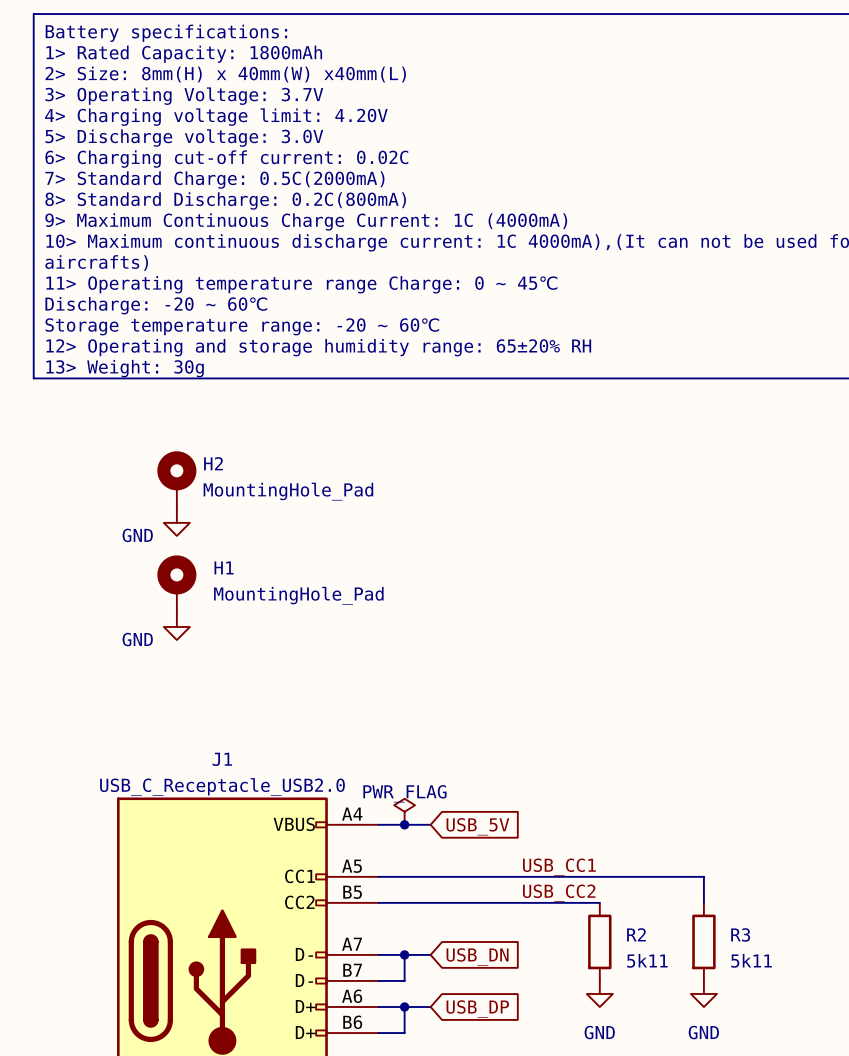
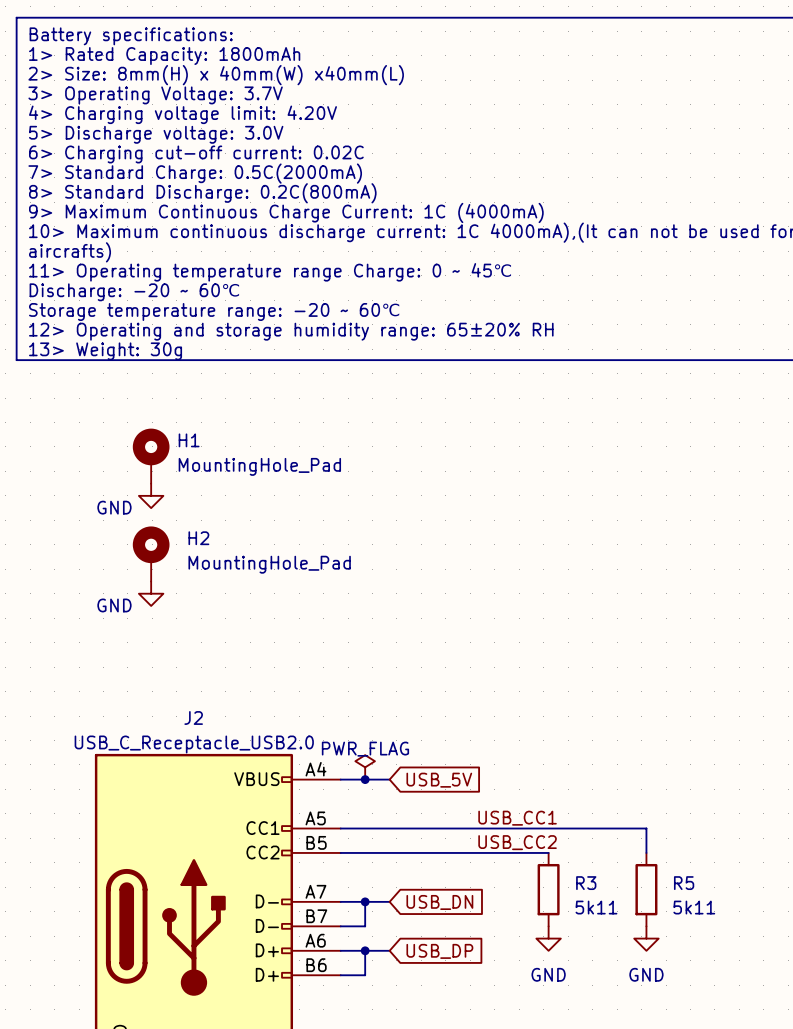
H2 name: H2 (213, 463) -> H1 (189, 440)
H1 name: H1 (224, 567) -> H2 (198, 538)
J1 name: J1 (222, 759) -> J2 (193, 717)
R2 name: R2 (636, 934) -> R3 (586, 883)
R3 name: R3 (740, 934) -> R5 (684, 883)

